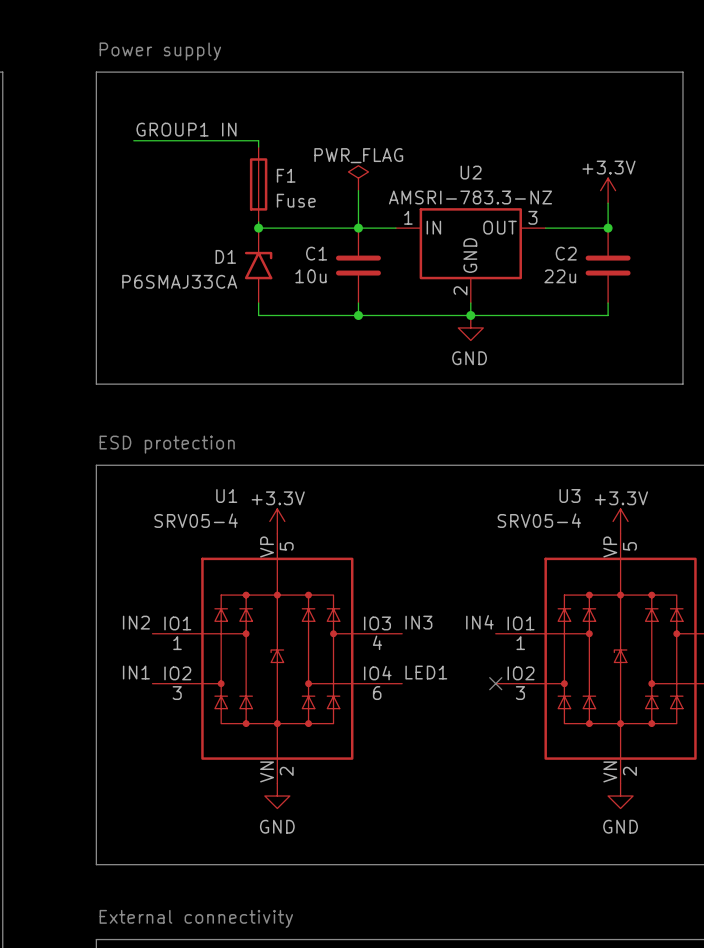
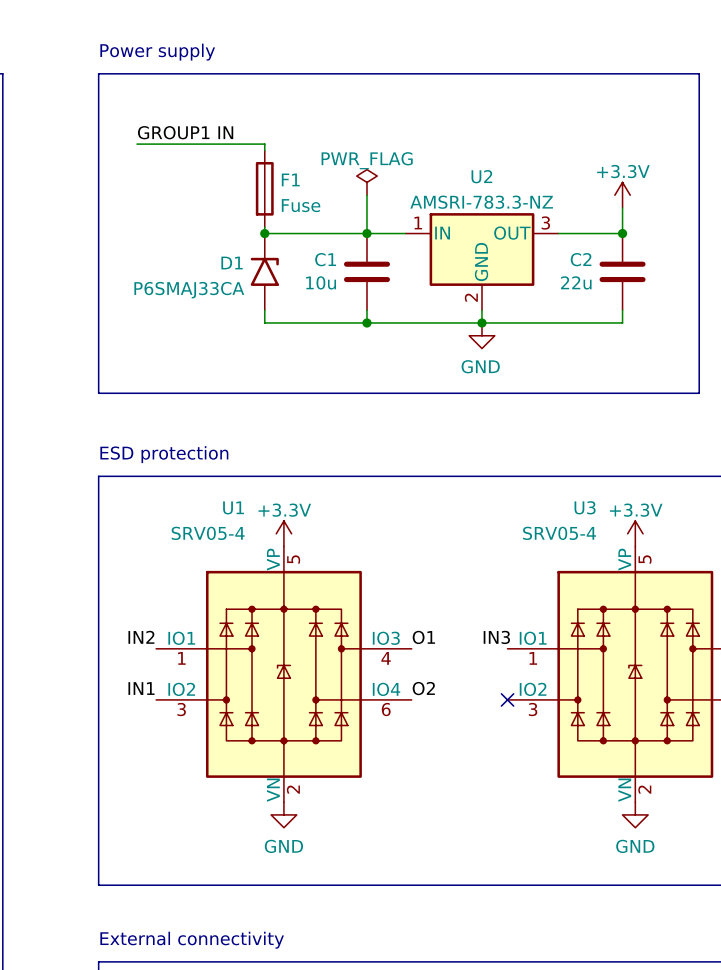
label: IN3 (418, 622) -> O1 (423, 637)
label: IN4 (479, 622) -> IN3 (496, 637)
label: LED1 (426, 672) -> O2 (423, 688)

